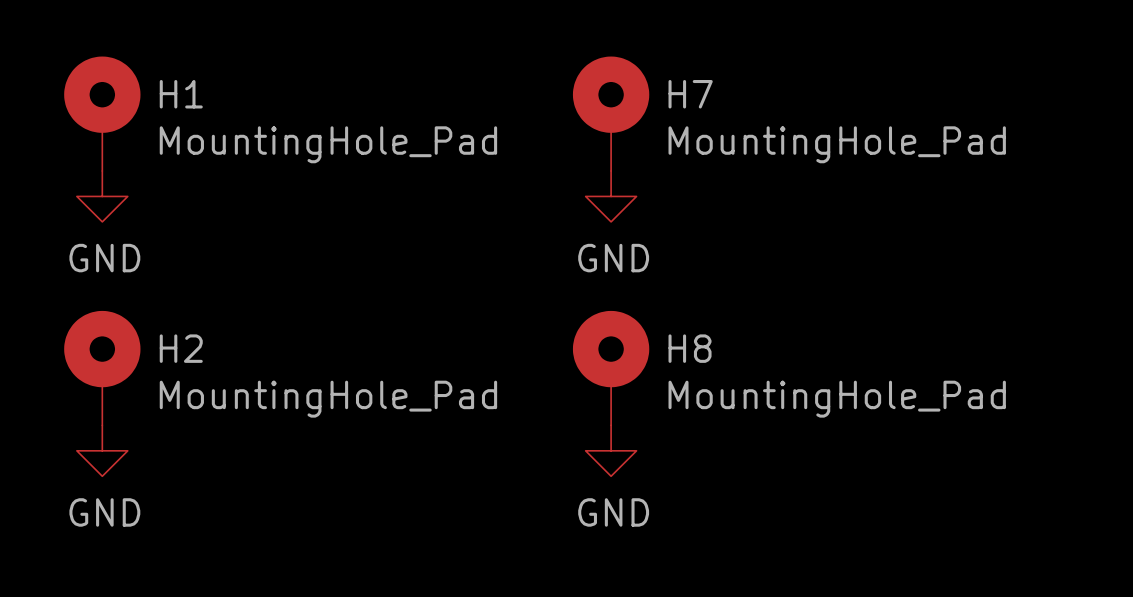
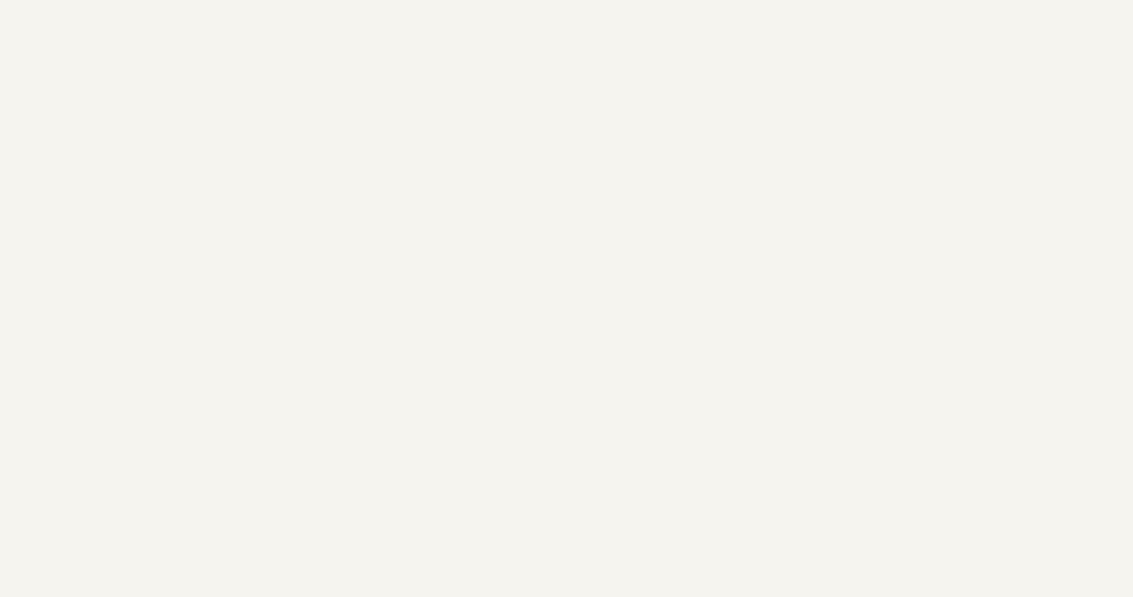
H1: MountingHole_Pad (102, 113) -> none
H7: MountingHole_Pad (611, 113) -> none
power symbol: GND (102, 196) -> none
power symbol: GND (611, 196) -> none
H2: MountingHole_Pad (102, 368) -> none
H8: MountingHole_Pad (611, 368) -> none
power symbol: GND (102, 450) -> none
power symbol: GND (611, 450) -> none

